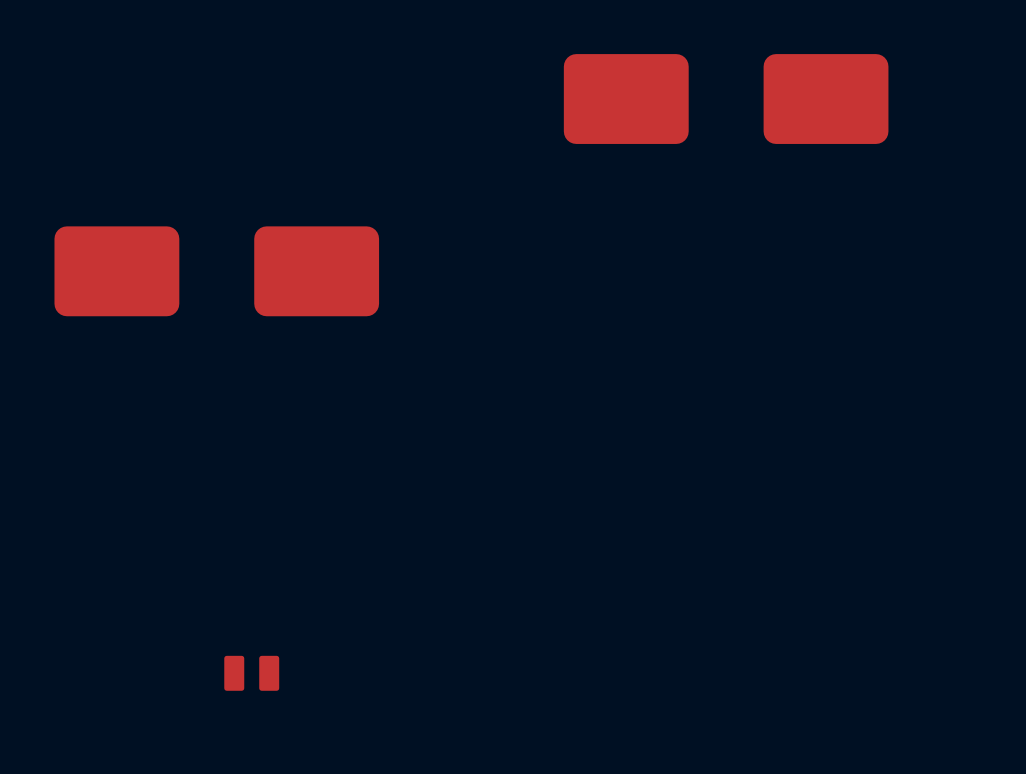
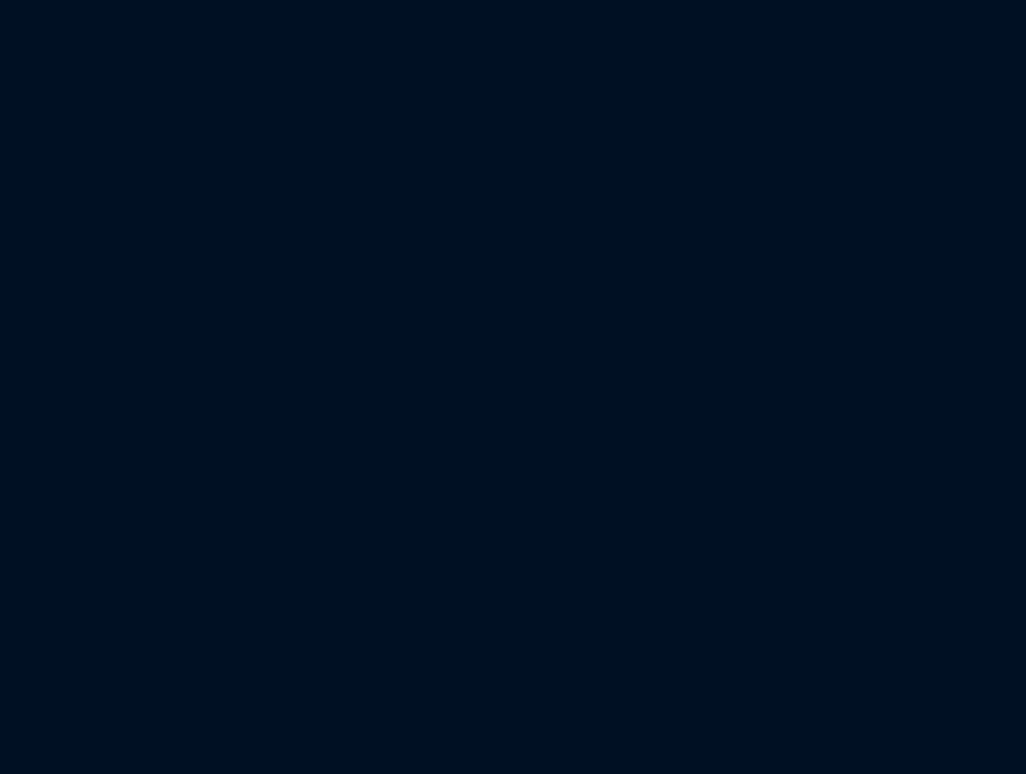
part: (726, 99) -> none
part: (216, 271) -> none
part: (251, 673) -> none

